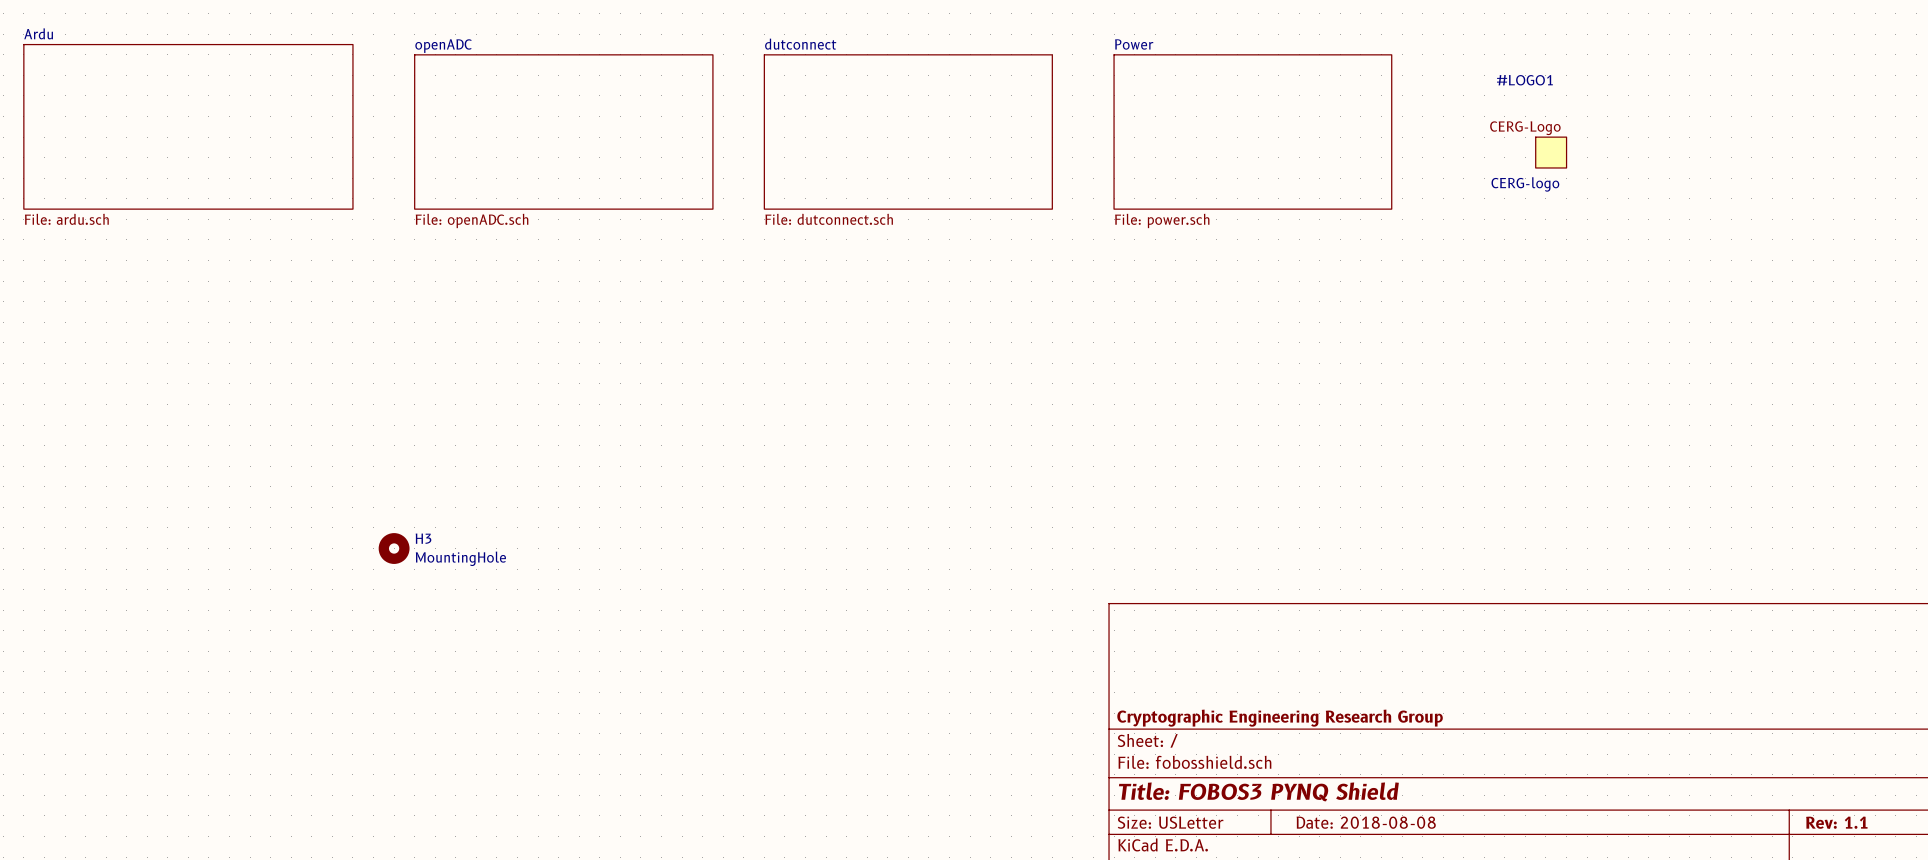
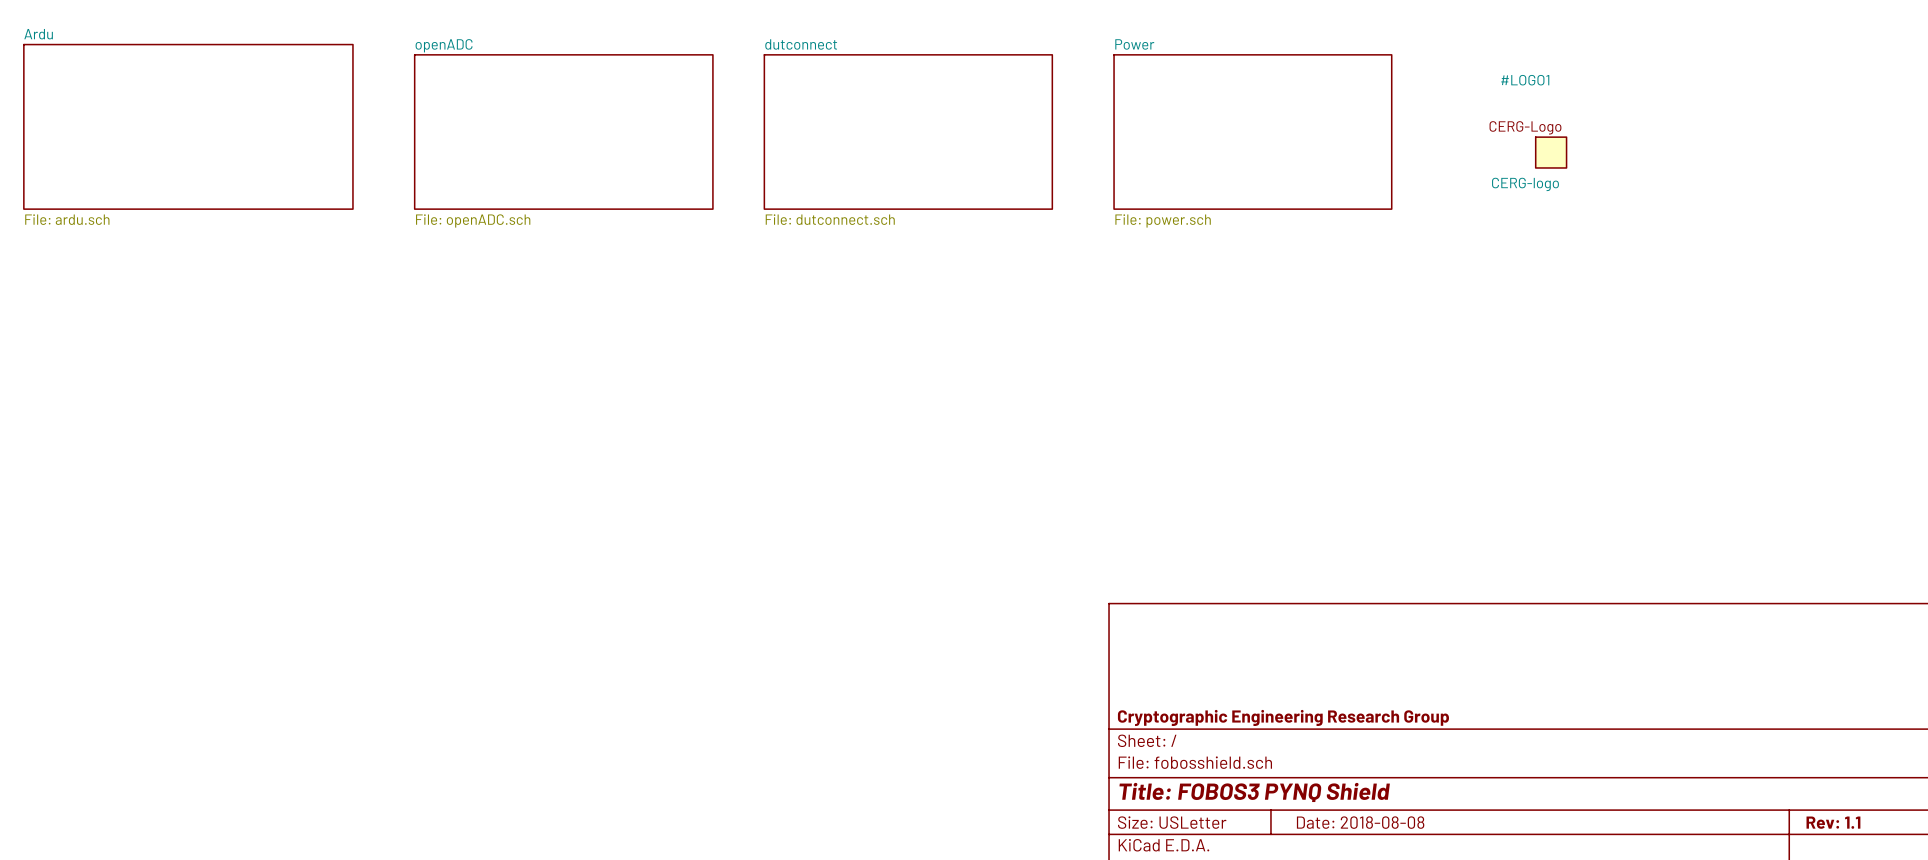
H3: MountingHole (394, 548) -> none

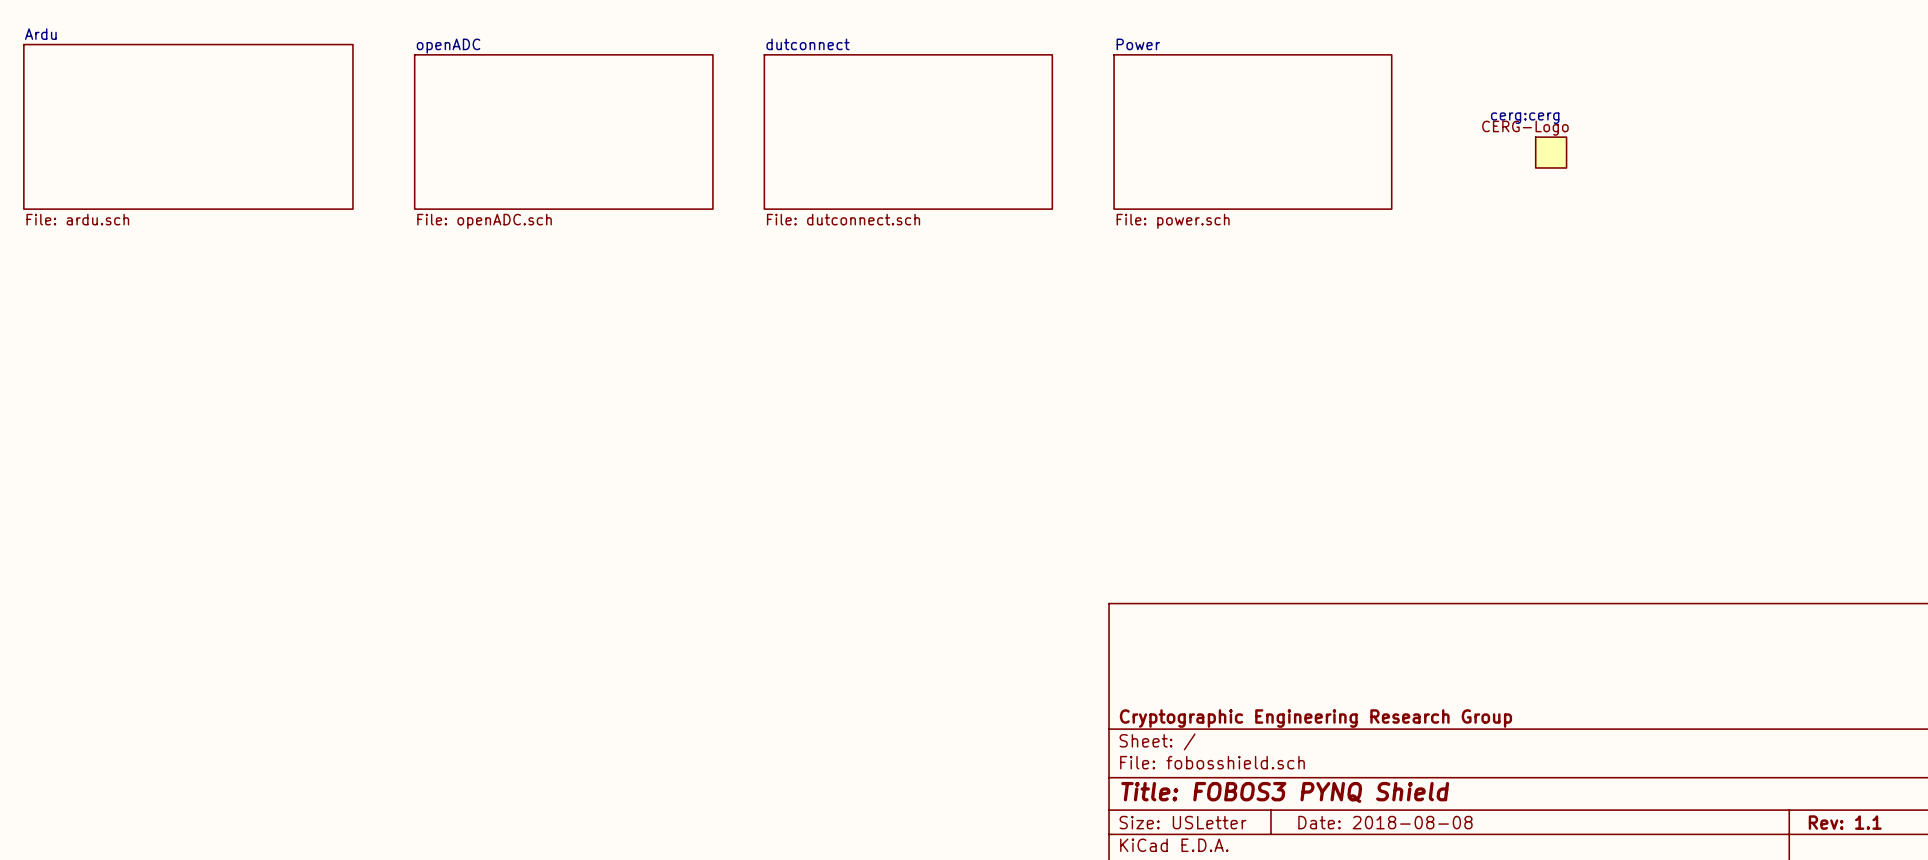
#LOGO1 name: #LOGO1 (1525, 80) -> none
#LOGO1 text: none -> cerg:cerg (1525, 118)
#LOGO1 text: CERG-logo (1525, 184) -> none

